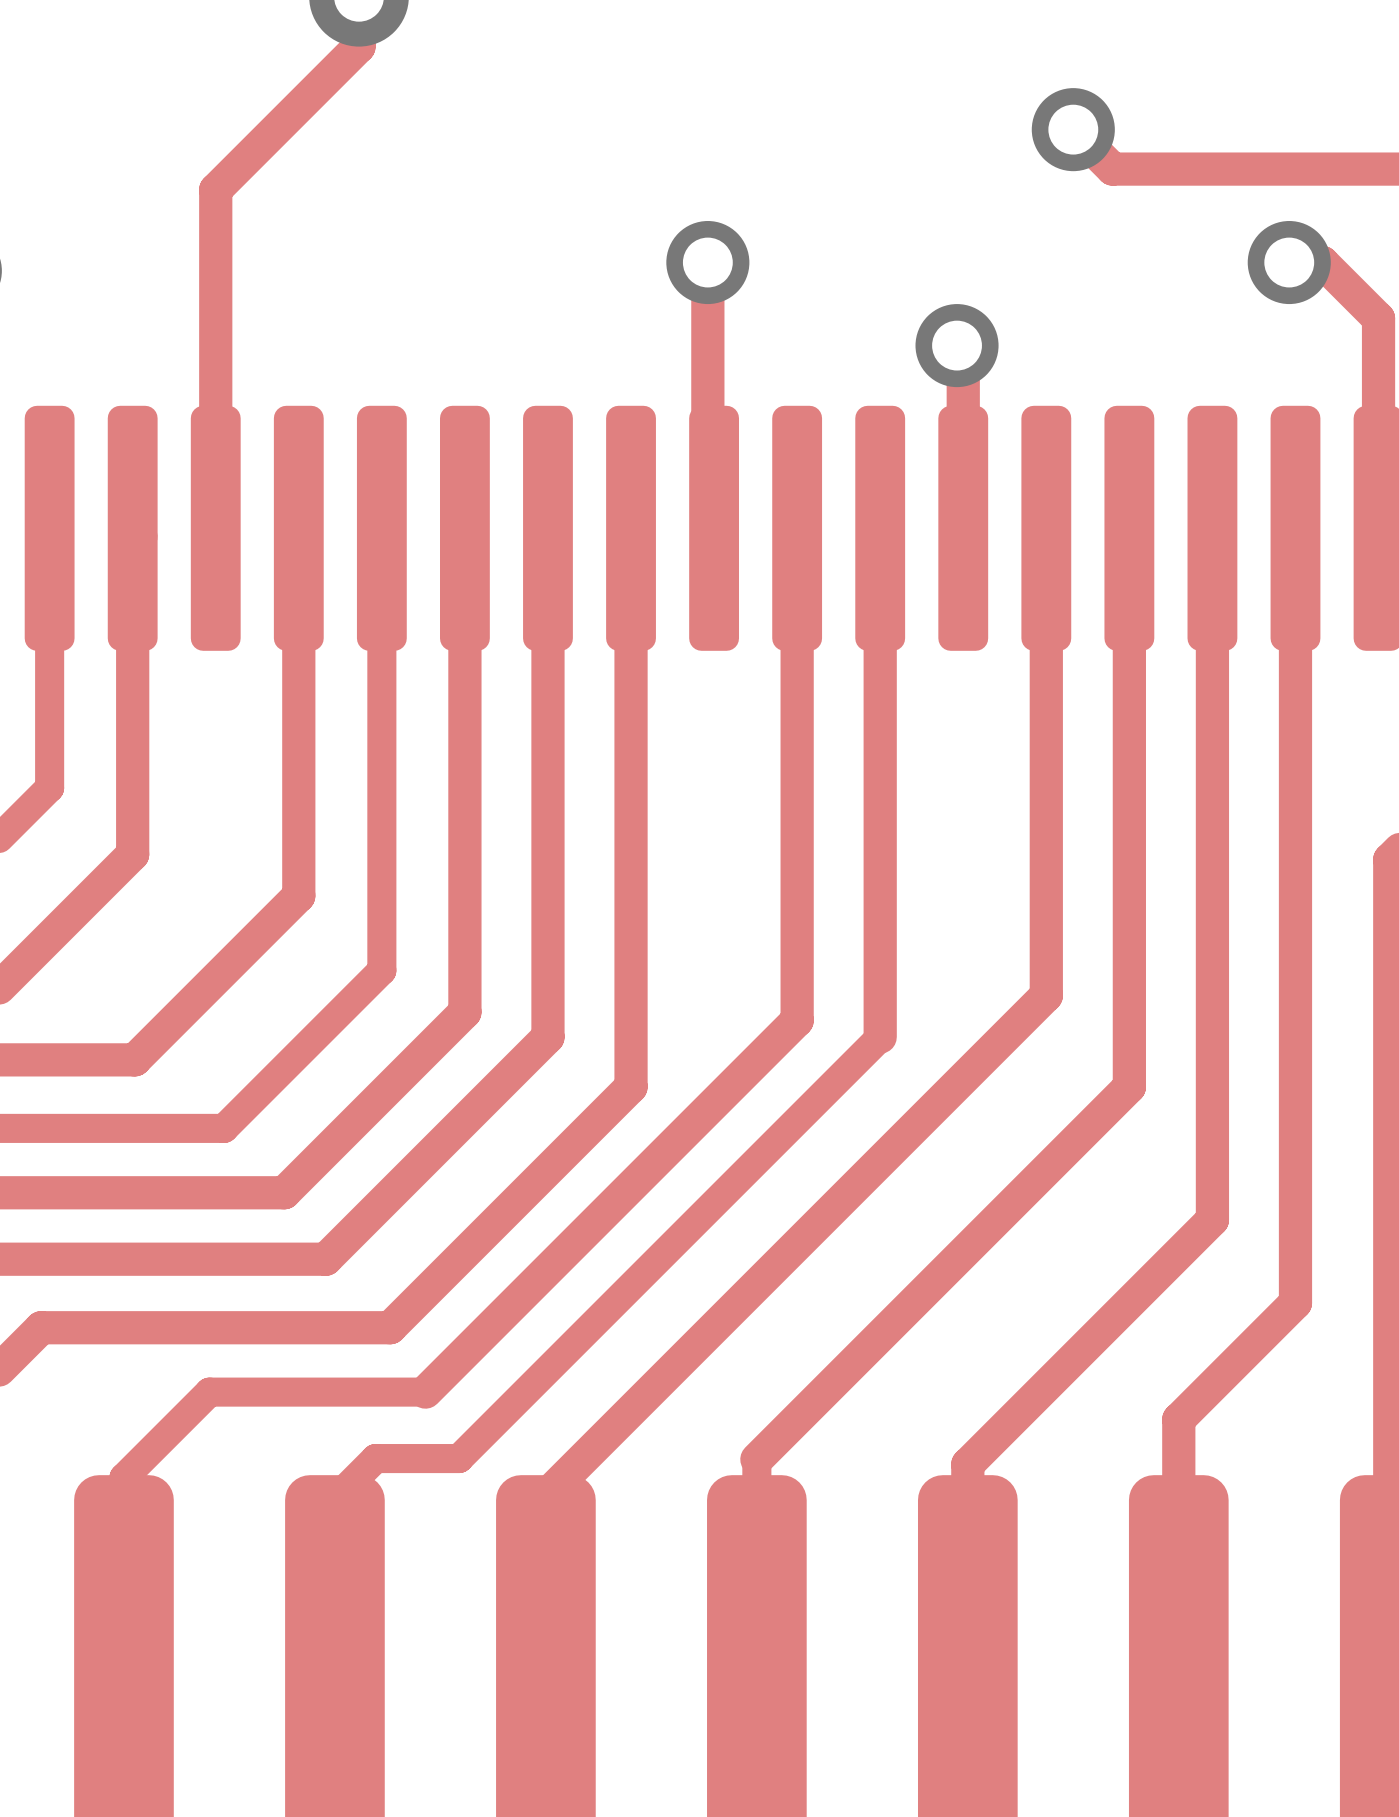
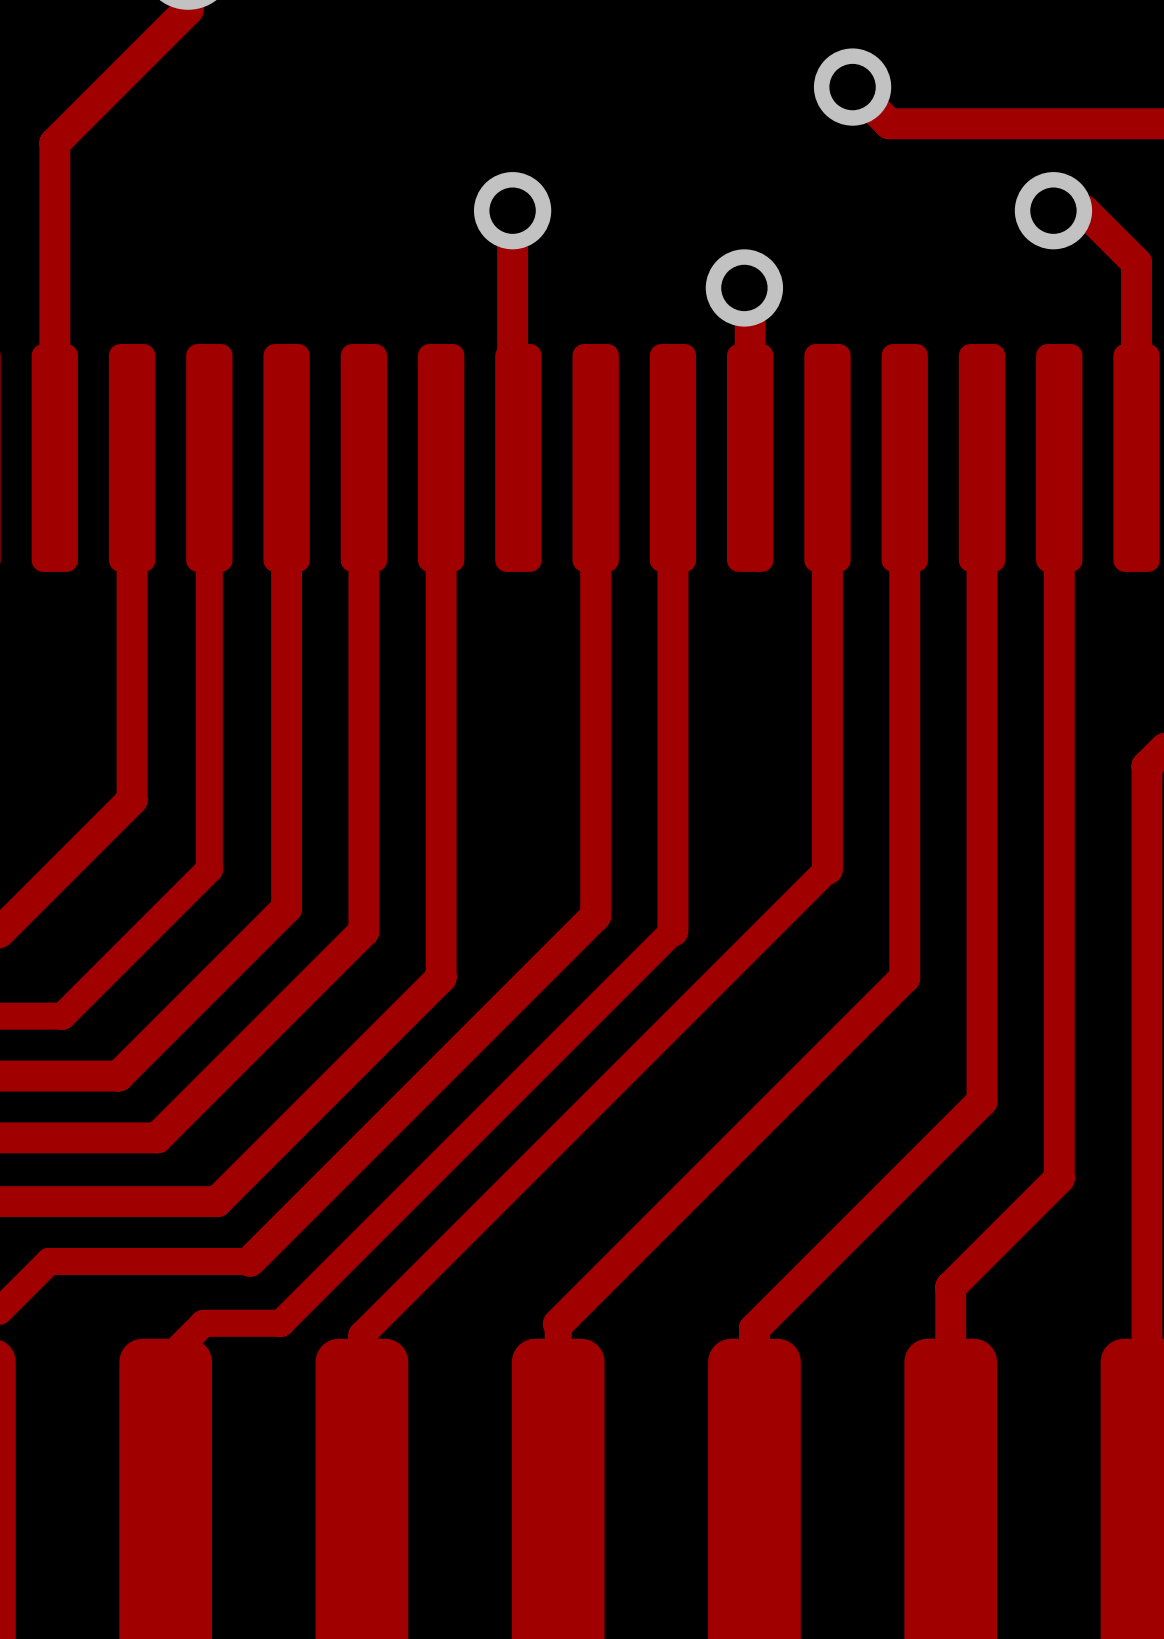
track: (1046, 970) (1046, 995) (545, 1495) -> (827, 869) (361, 1334) (361, 1358)

